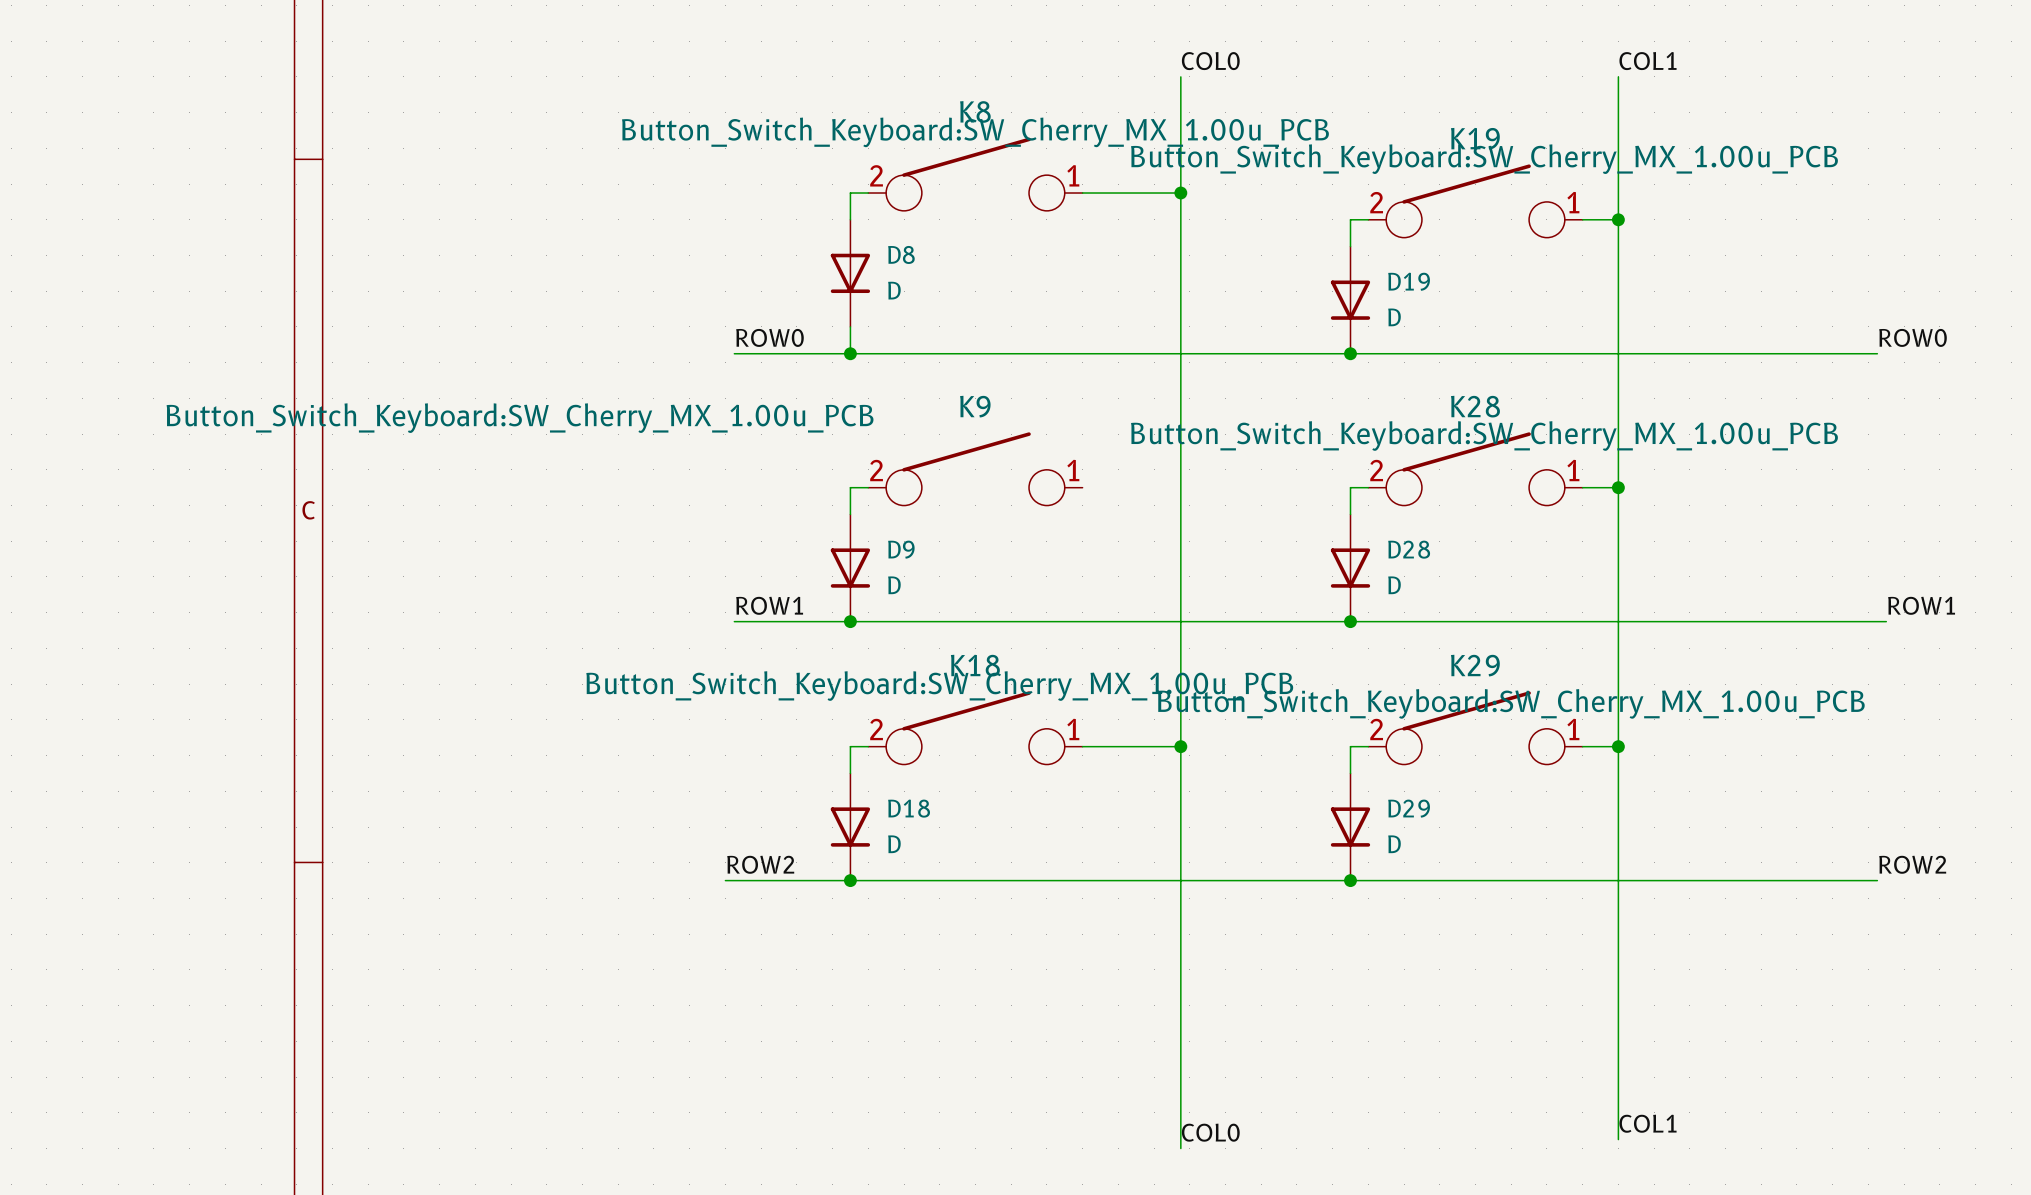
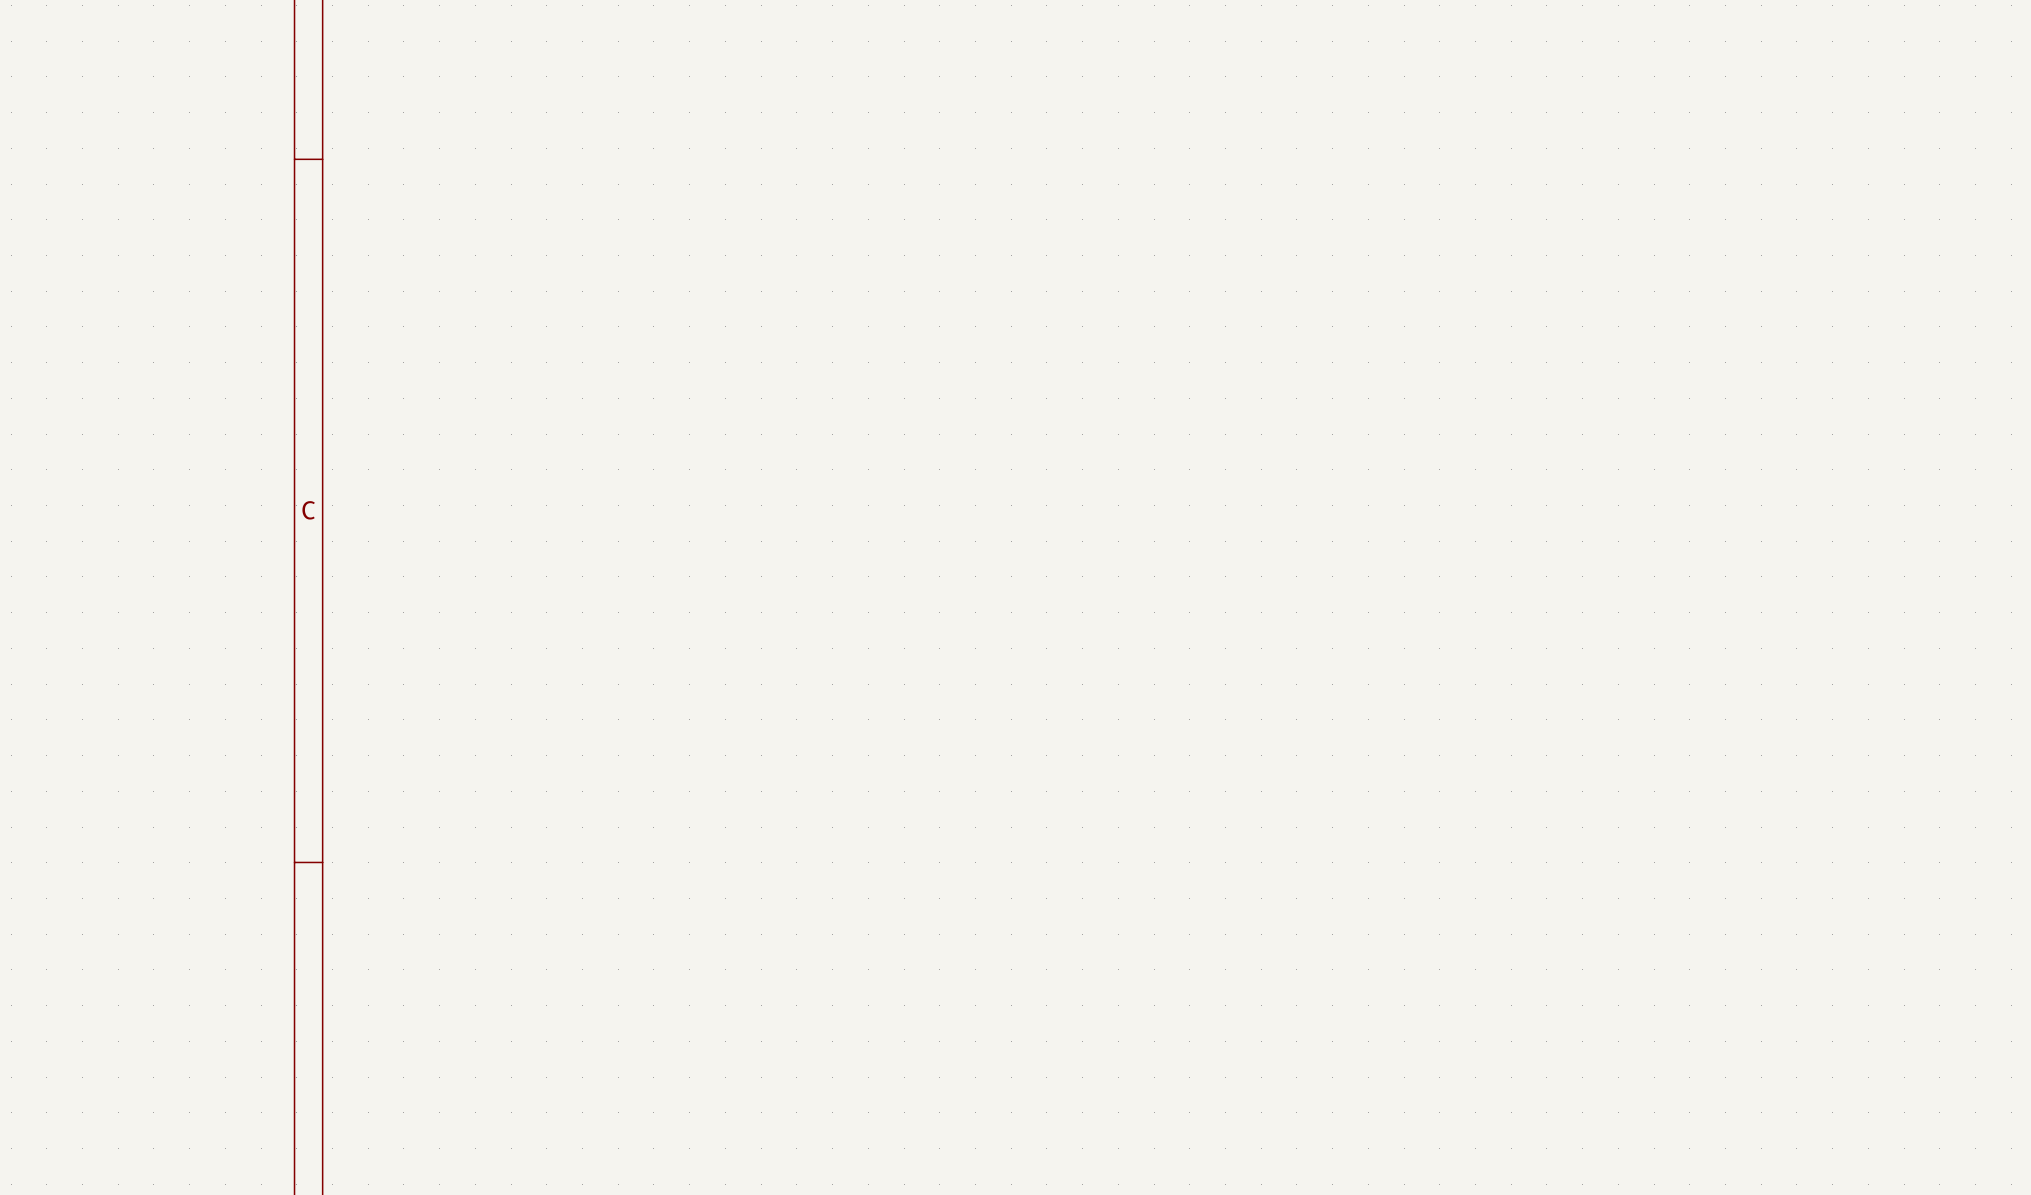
label: COL0 (1210, 61) -> none
label: COL1 (1648, 61) -> none
wire: (1180, 76) (1180, 746) -> none
wire: (1618, 76) (1618, 1139) -> none
K8: (975, 174) -> none
wire: (868, 193) (850, 193) (850, 219) -> none
wire: (1082, 193) (1180, 193) -> none
junction: (1180, 193) -> none
K19: (1475, 201) -> none
wire: (1368, 219) (1350, 219) (1350, 246) -> none
wire: (1582, 219) (1618, 219) -> none
junction: (1618, 219) -> none
D8: D (850, 273) -> none
D19: D (1350, 300) -> none
wire: (850, 326) (850, 353) -> none
label: ROW0 (769, 337) -> none
label: ROW0 (1912, 337) -> none
wire: (734, 353) (1877, 353) -> none
junction: (850, 353) -> none
junction: (1350, 353) -> none
K9: (975, 468) -> none
K28: (1475, 468) -> none
wire: (868, 487) (850, 487) (850, 514) -> none
wire: (1368, 487) (1350, 487) (1350, 514) -> none
wire: (1582, 487) (1618, 487) -> none
junction: (1618, 487) -> none
D9: D (850, 568) -> none
D28: D (1350, 568) -> none
label: ROW1 (769, 605) -> none
label: ROW1 (1921, 605) -> none
wire: (734, 621) (1886, 621) -> none
junction: (850, 621) -> none
junction: (1350, 621) -> none
K18: (975, 727) -> none
K29: (1475, 727) -> none
wire: (868, 746) (850, 746) (850, 773) -> none
wire: (1082, 746) (1180, 746) -> none
wire: (1180, 746) (1180, 1148) -> none
junction: (1180, 746) -> none
wire: (1368, 746) (1350, 746) (1350, 773) -> none
wire: (1582, 746) (1618, 746) -> none
junction: (1618, 746) -> none
D18: D (850, 827) -> none
D29: D (1350, 827) -> none
label: ROW2 (760, 864) -> none
label: ROW2 (1912, 864) -> none
wire: (725, 880) (1877, 880) -> none
junction: (850, 880) -> none
junction: (1350, 880) -> none
label: COL1 (1648, 1123) -> none
label: COL0 (1210, 1132) -> none

